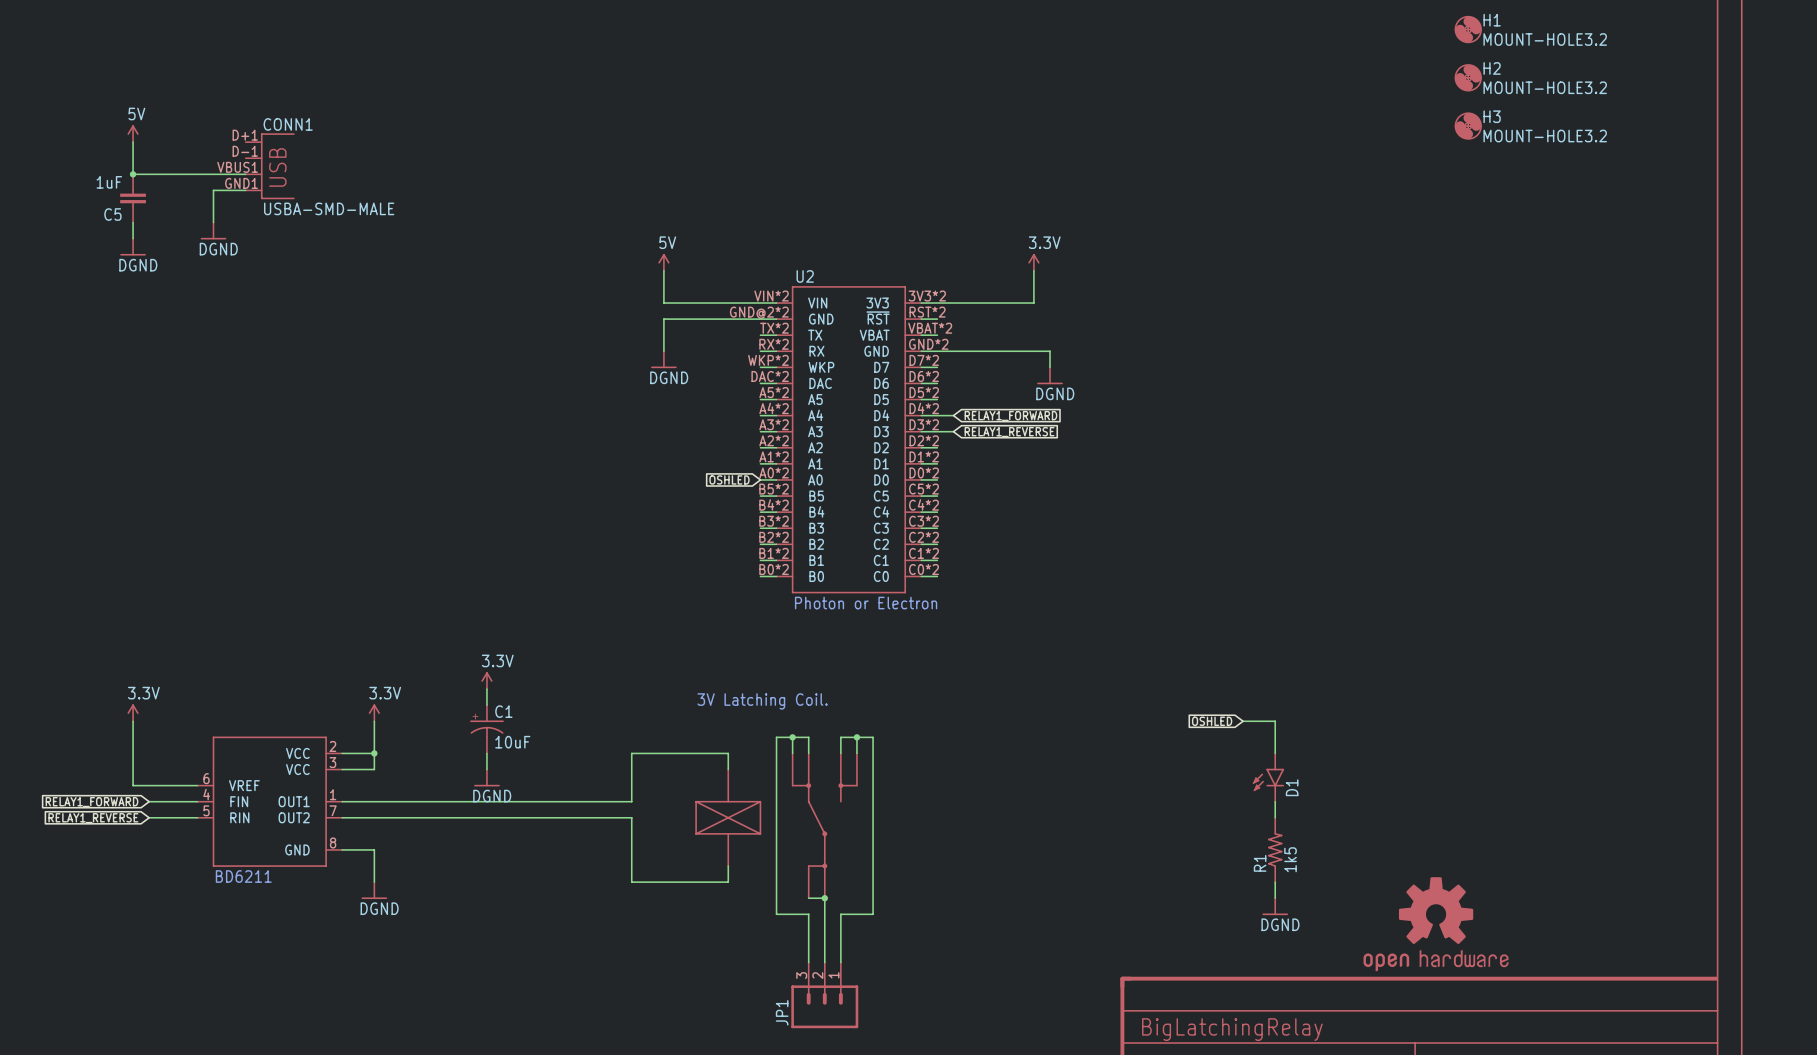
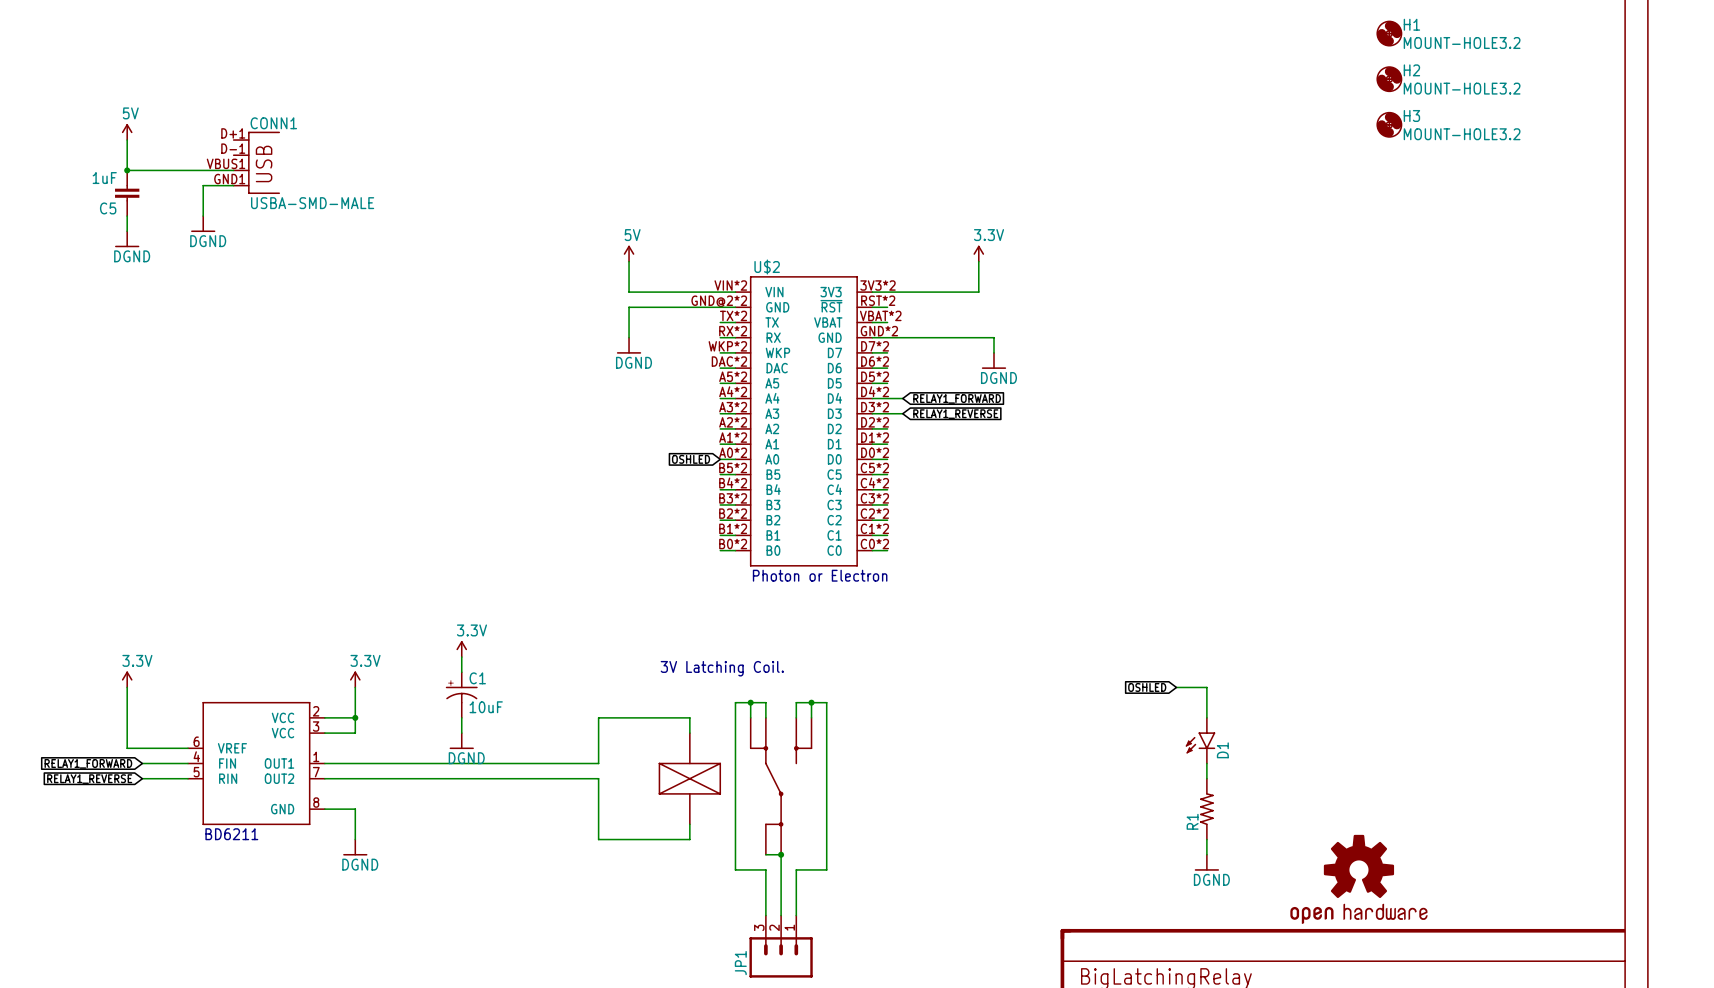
U2 name: U2 (805, 276) -> U$2 (767, 266)
R1 value: 1k5 (1290, 859) -> none

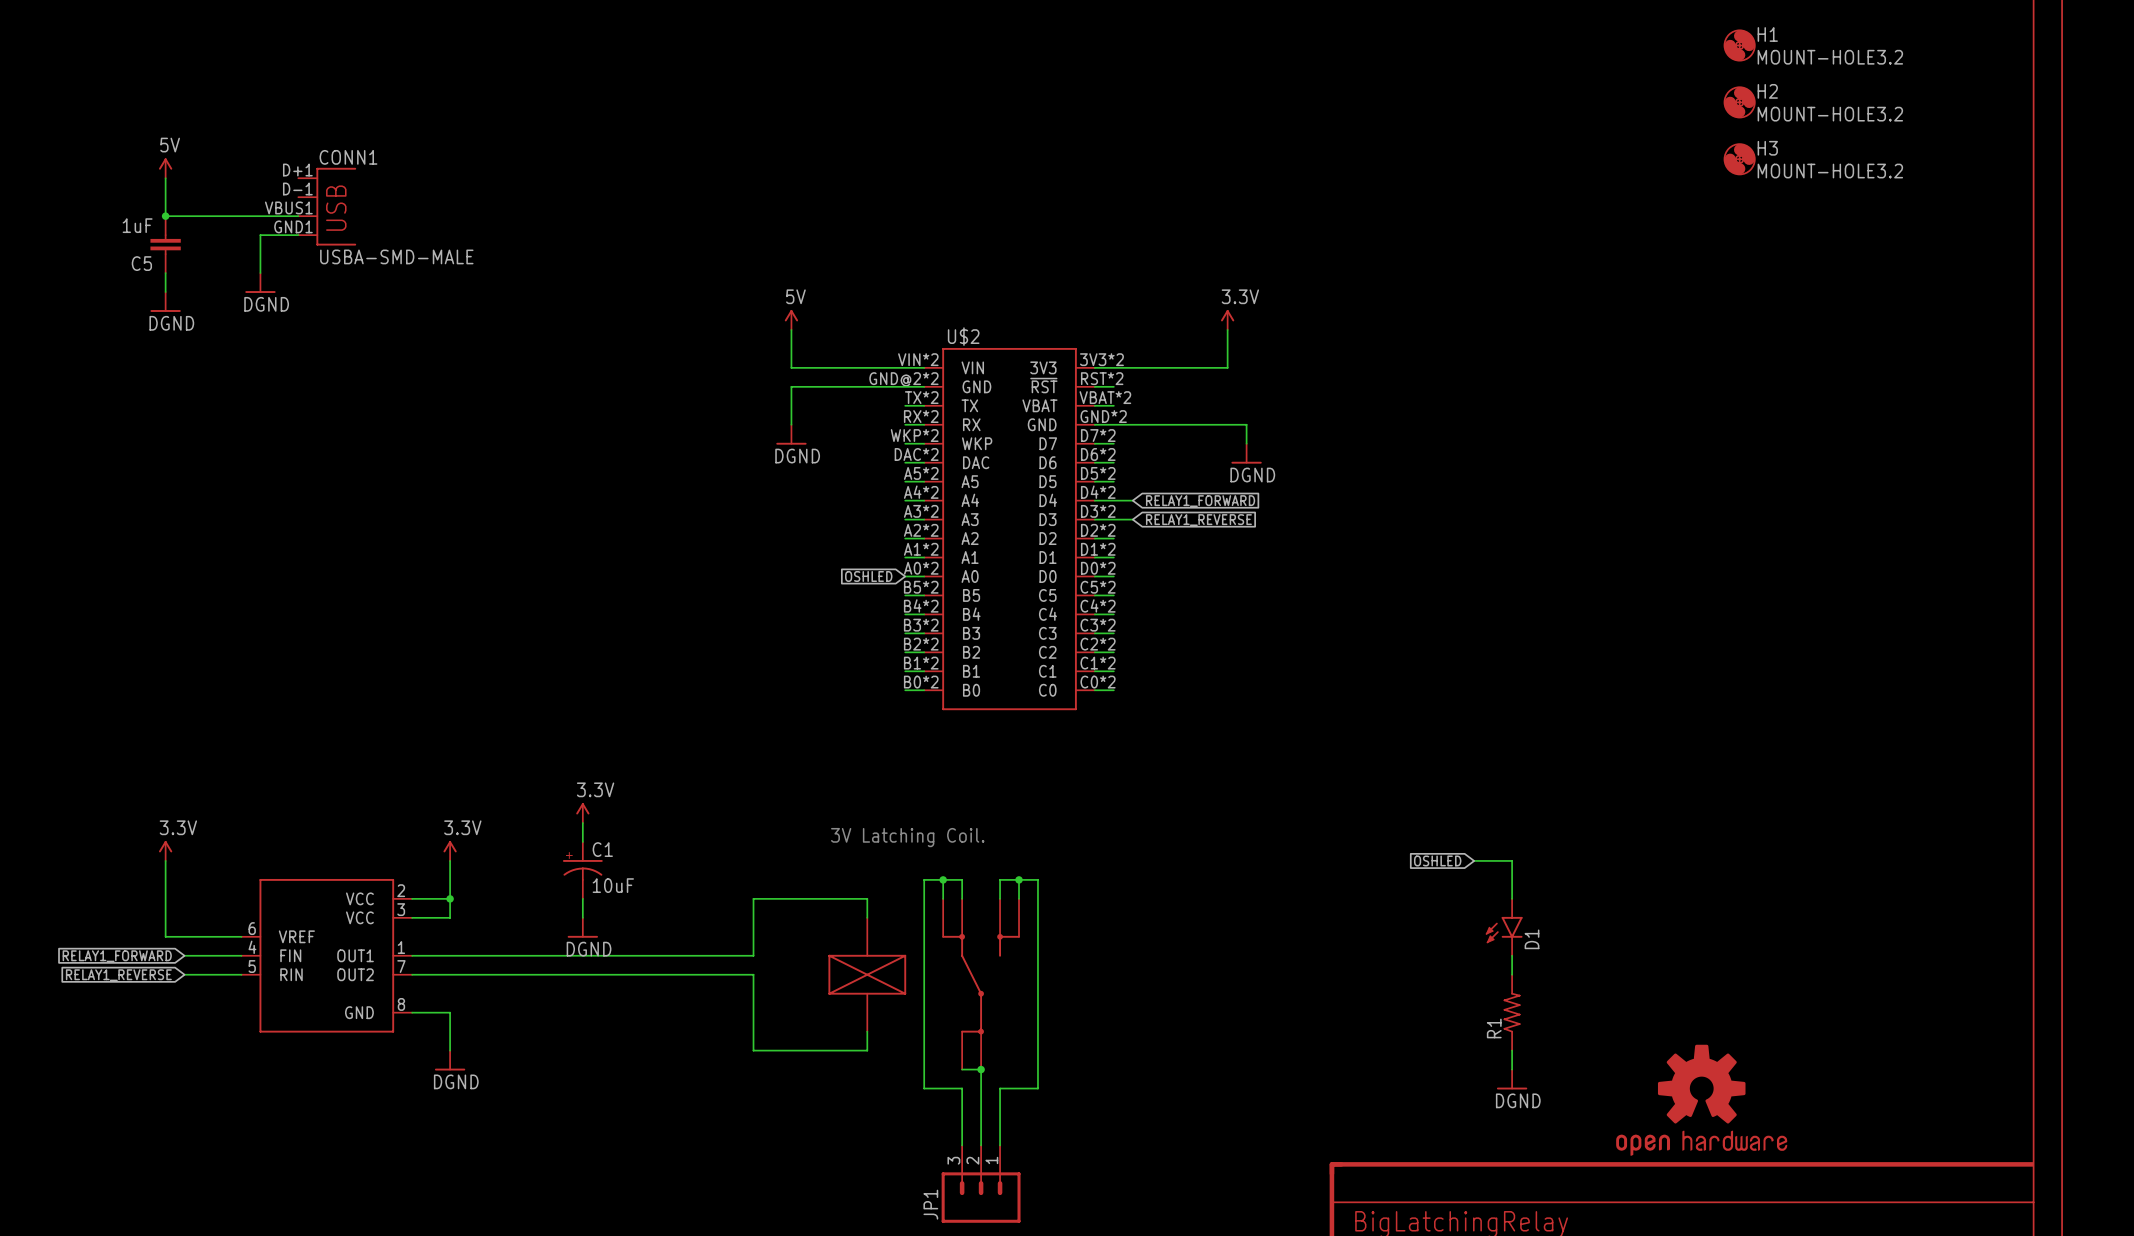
text: Photon or Electron (820, 575) -> none
text: BD6211 (231, 834) -> none

